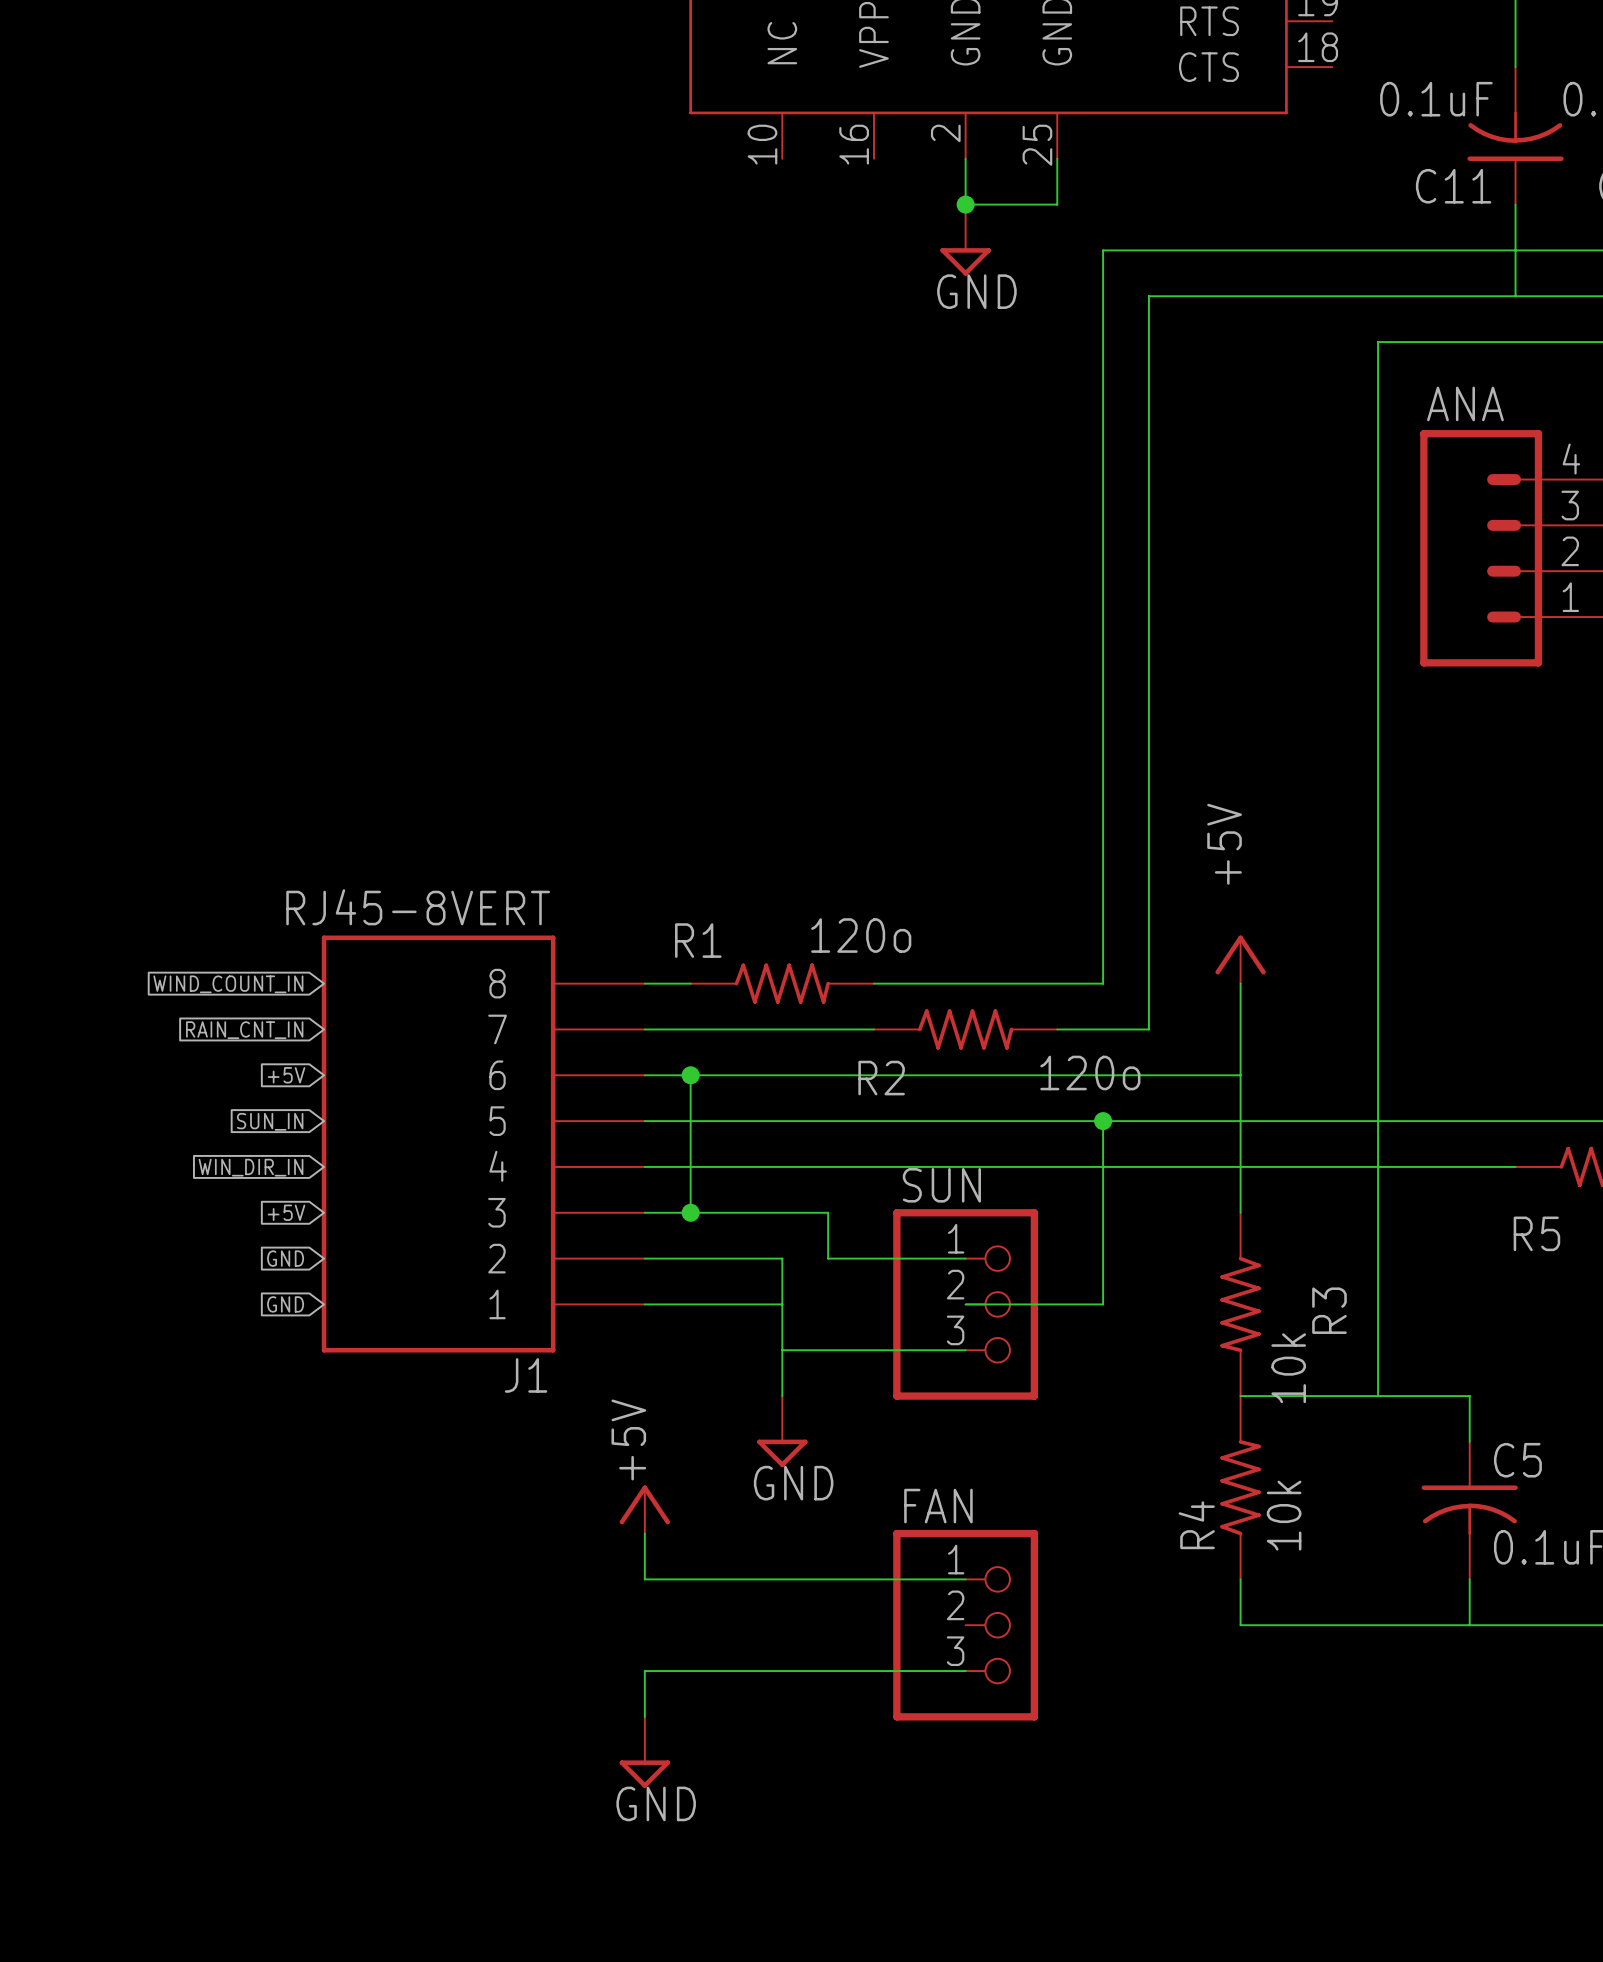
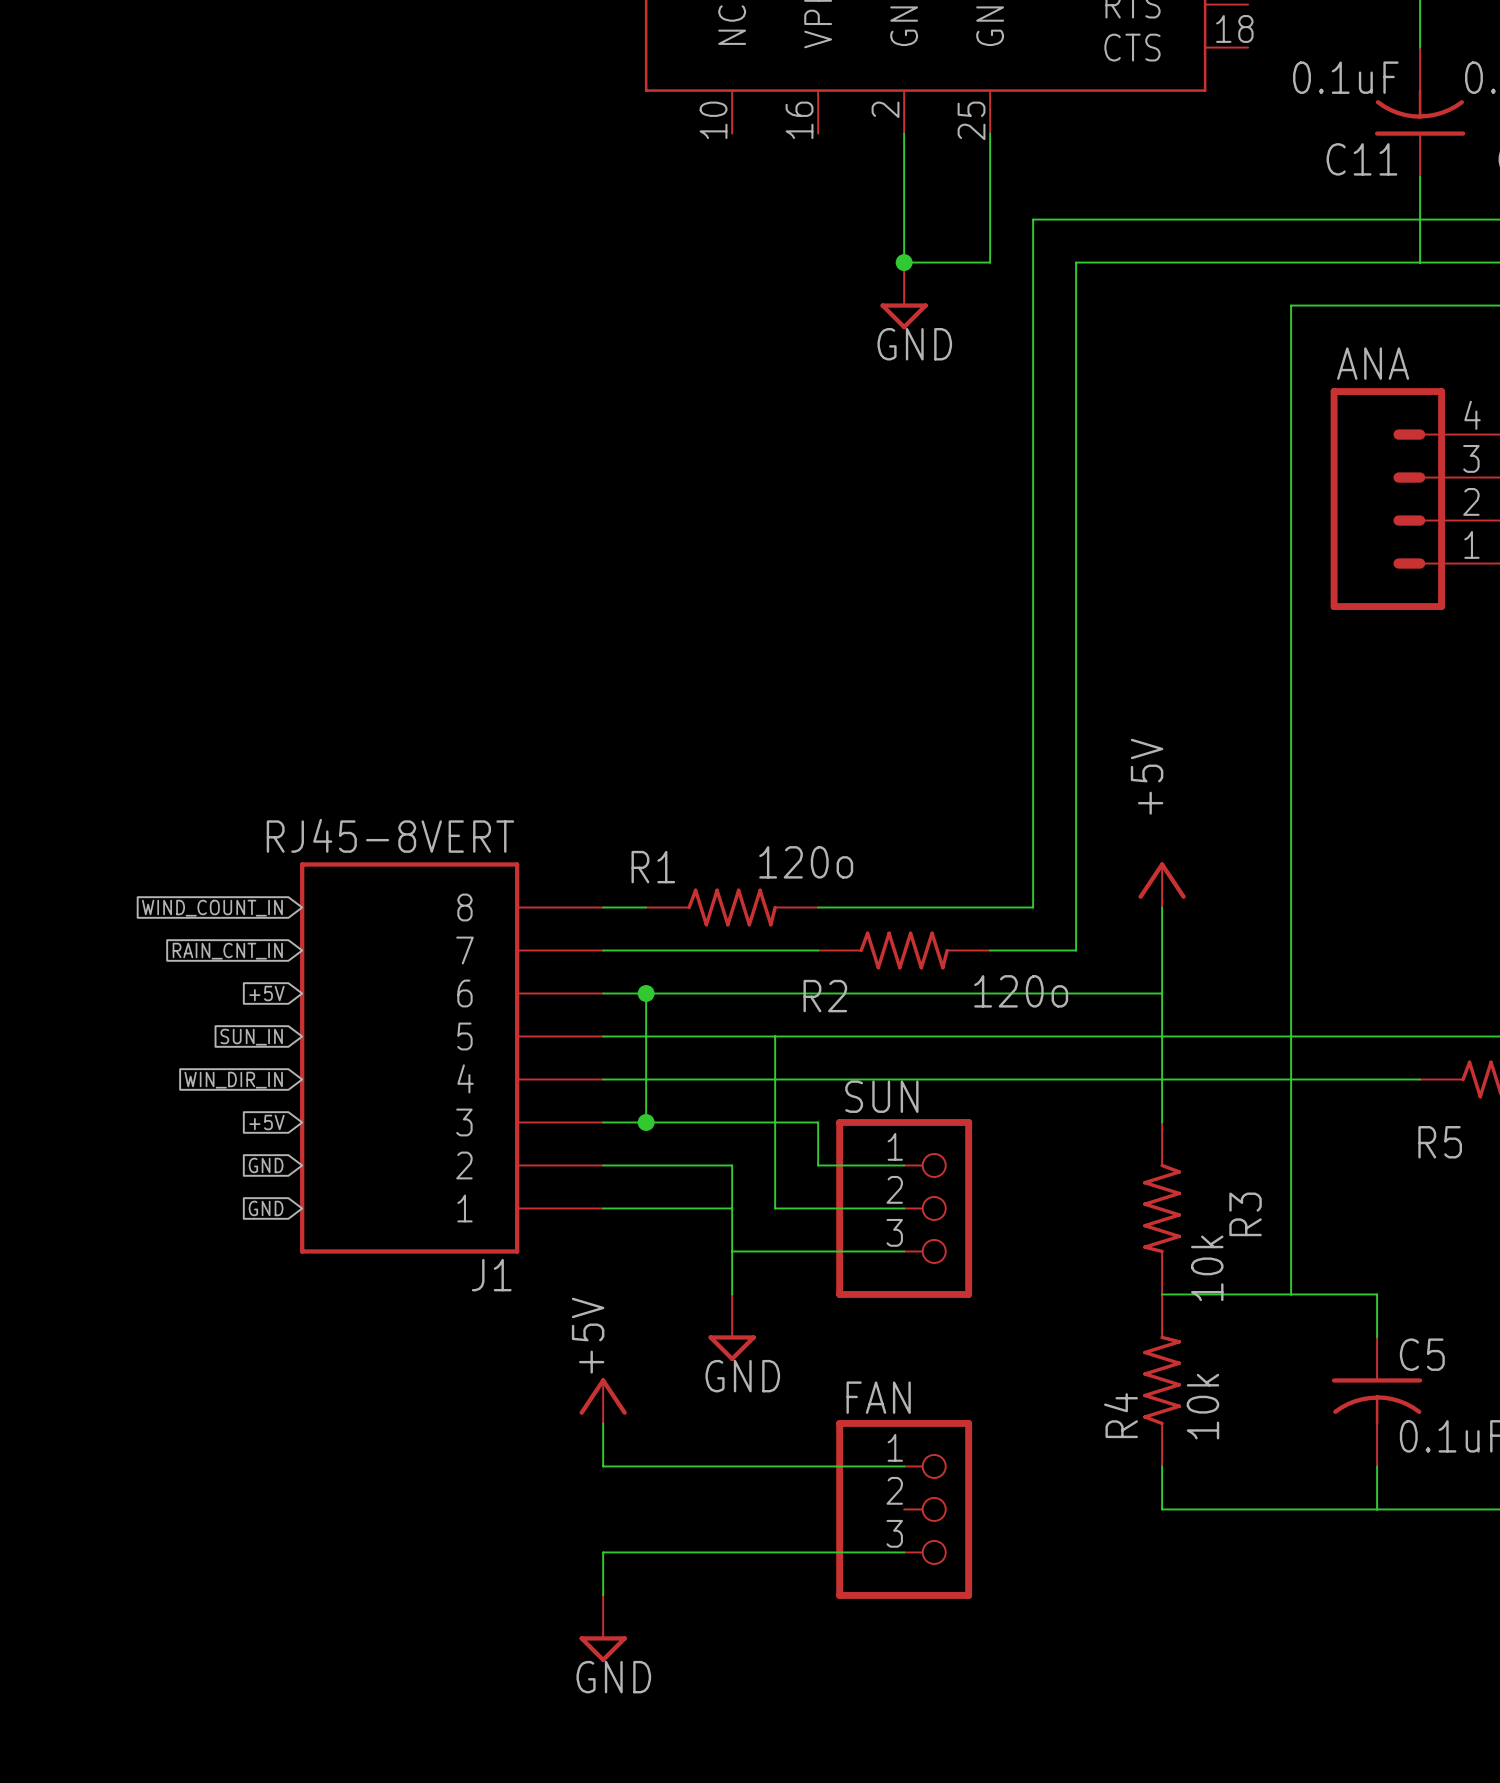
wire: (965, 204) (1057, 204) -> (904, 176) (904, 262) (990, 262) (990, 176)
junction position: (965, 204) -> (904, 262)
power symbol position: GND (965, 240) -> GND (904, 295)
wire: none -> (775, 1036) (775, 1122) (818, 1122) (818, 1165)
wire: (1103, 1121) (1103, 1304) (965, 1304) -> none
junction: (1103, 1121) -> none
wire: (828, 1258) (873, 1258) -> (775, 1165) (775, 1208) (904, 1208)

